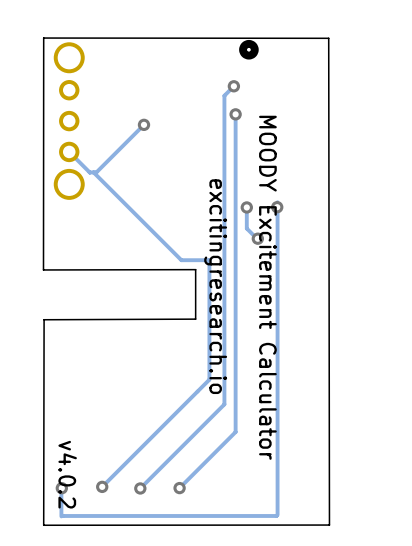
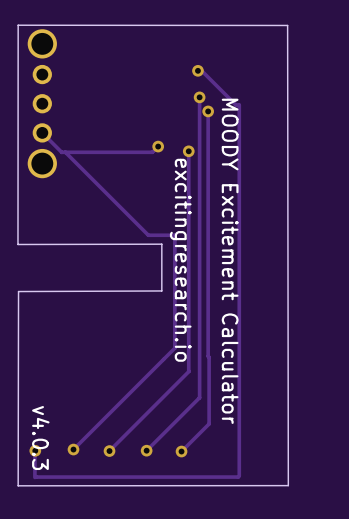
part: (248, 49) -> none
track: none -> (199, 68) (235, 105) (239, 105) (239, 180)
track: (233, 86) (224, 95) (224, 404) (140, 488) -> (188, 151) (189, 371) (109, 450)
track: (143, 124) (96, 172) -> (158, 146) (152, 152) (67, 152)
via: (143, 124) -> none
track: none -> (208, 111) (209, 423) (181, 451)
via: none -> (208, 111)
via: none -> (158, 146)
via: none -> (188, 151)
track: (246, 207) (246, 228) (257, 238) -> none
via: (246, 207) -> none
via: (277, 207) -> none
via: (257, 238) -> none
text: v4.0.2 (67, 474) -> v4.0.3 (40, 438)
via: none -> (181, 451)

